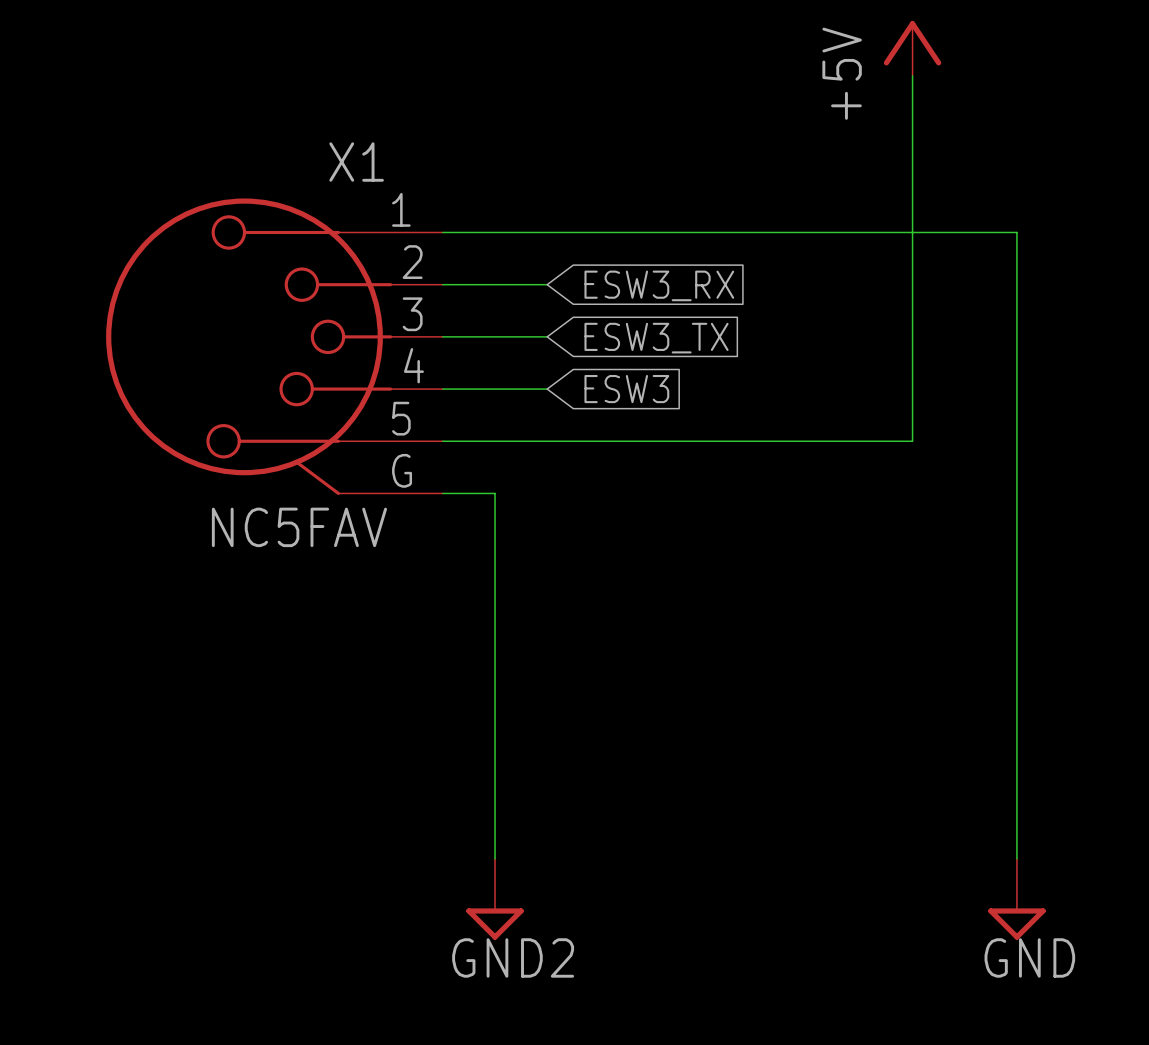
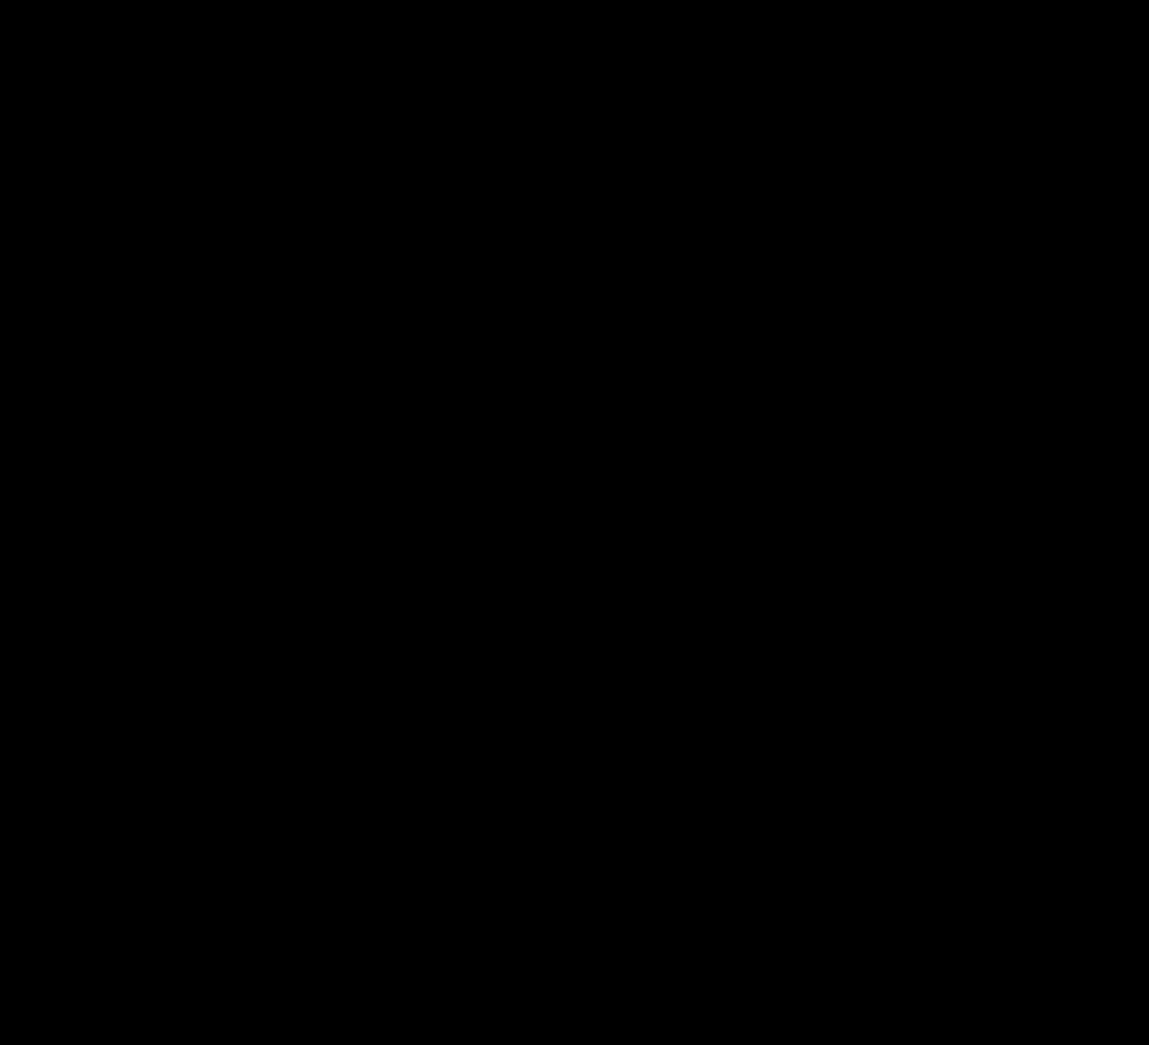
power symbol: +5V (912, 48) -> none
wire: (912, 75) (912, 441) (442, 441) -> none
wire: (442, 232) (1016, 232) (1016, 858) -> none
wire: (442, 284) (547, 284) -> none
global label: ESW3_RX (659, 285) -> none
wire: (442, 336) (547, 336) -> none
global label: ESW3_TX (656, 338) -> none
X1: NC5FAV (274, 346) -> none
wire: (442, 389) (547, 389) -> none
global label: ESW3 (626, 389) -> none
wire: (442, 493) (495, 493) (495, 858) -> none
power symbol: GND2 (495, 899) -> none
power symbol: GND (1016, 899) -> none

